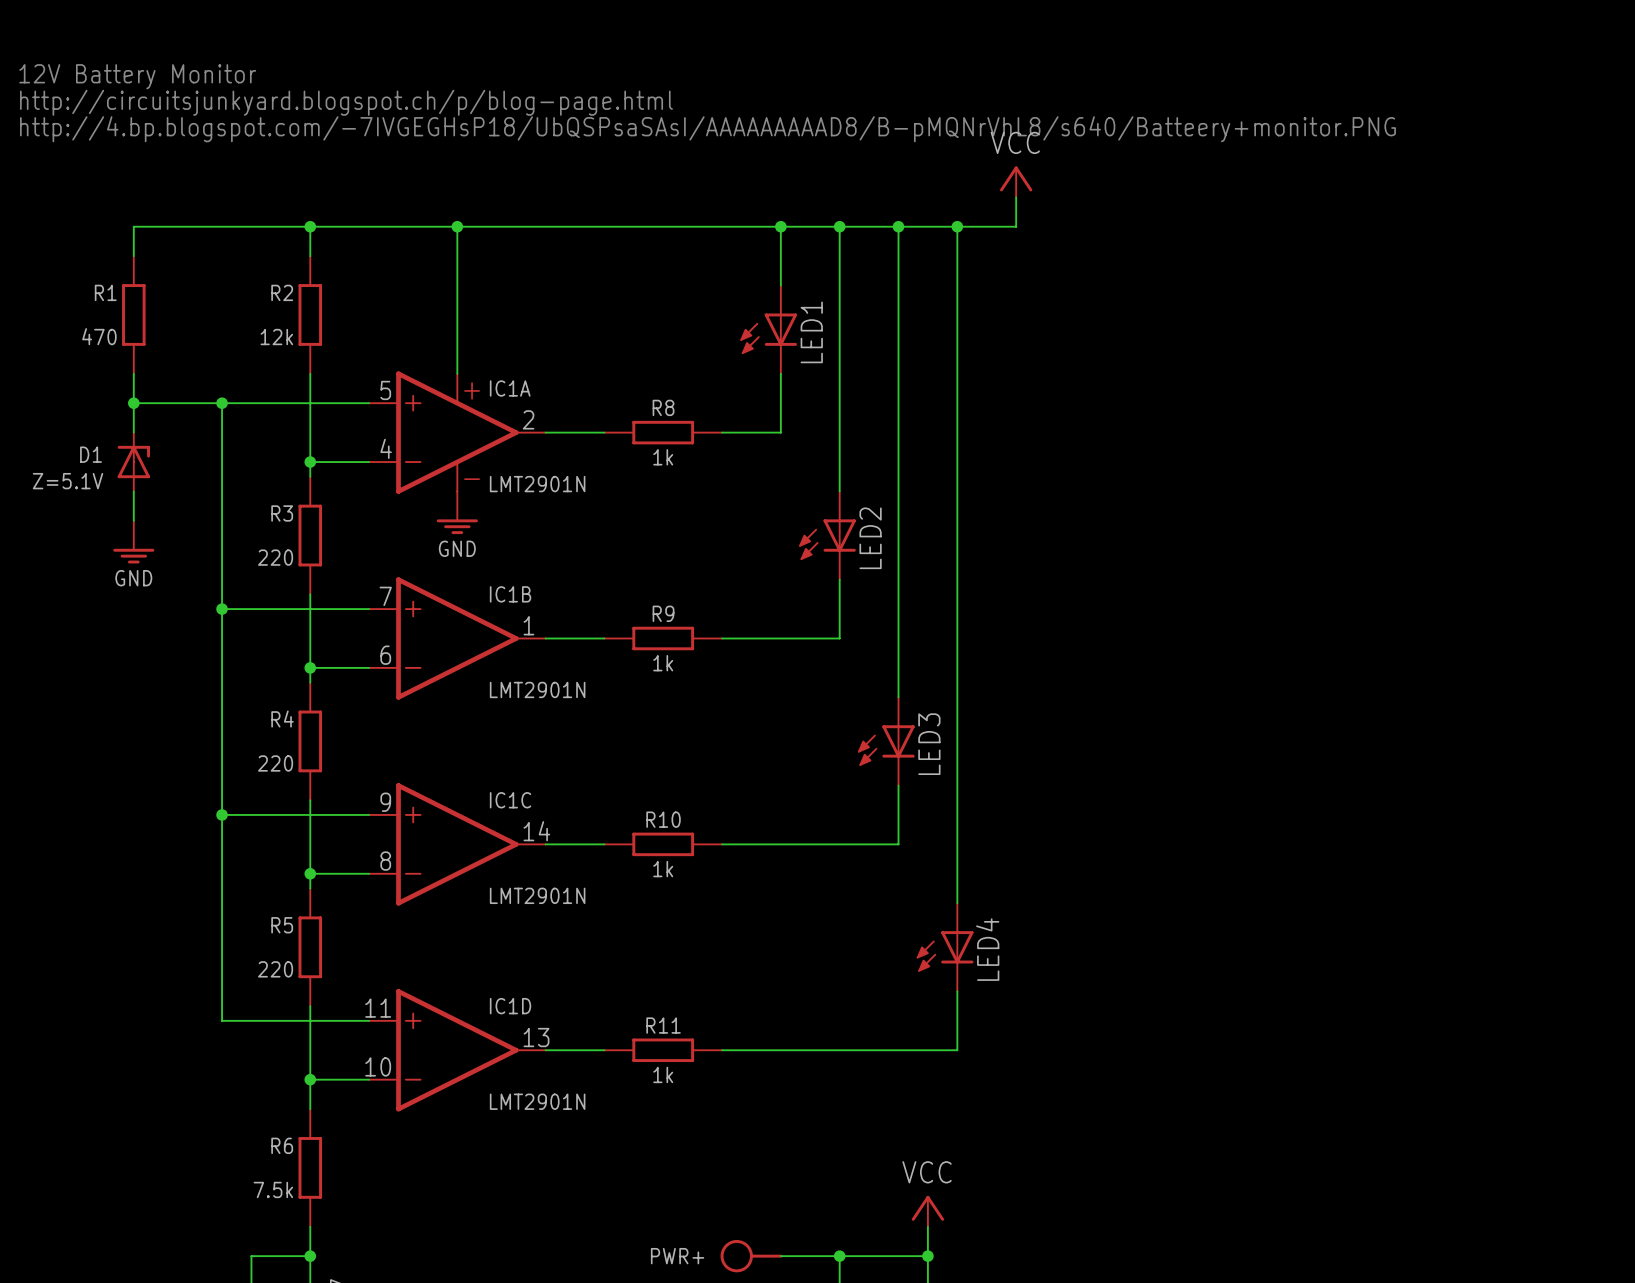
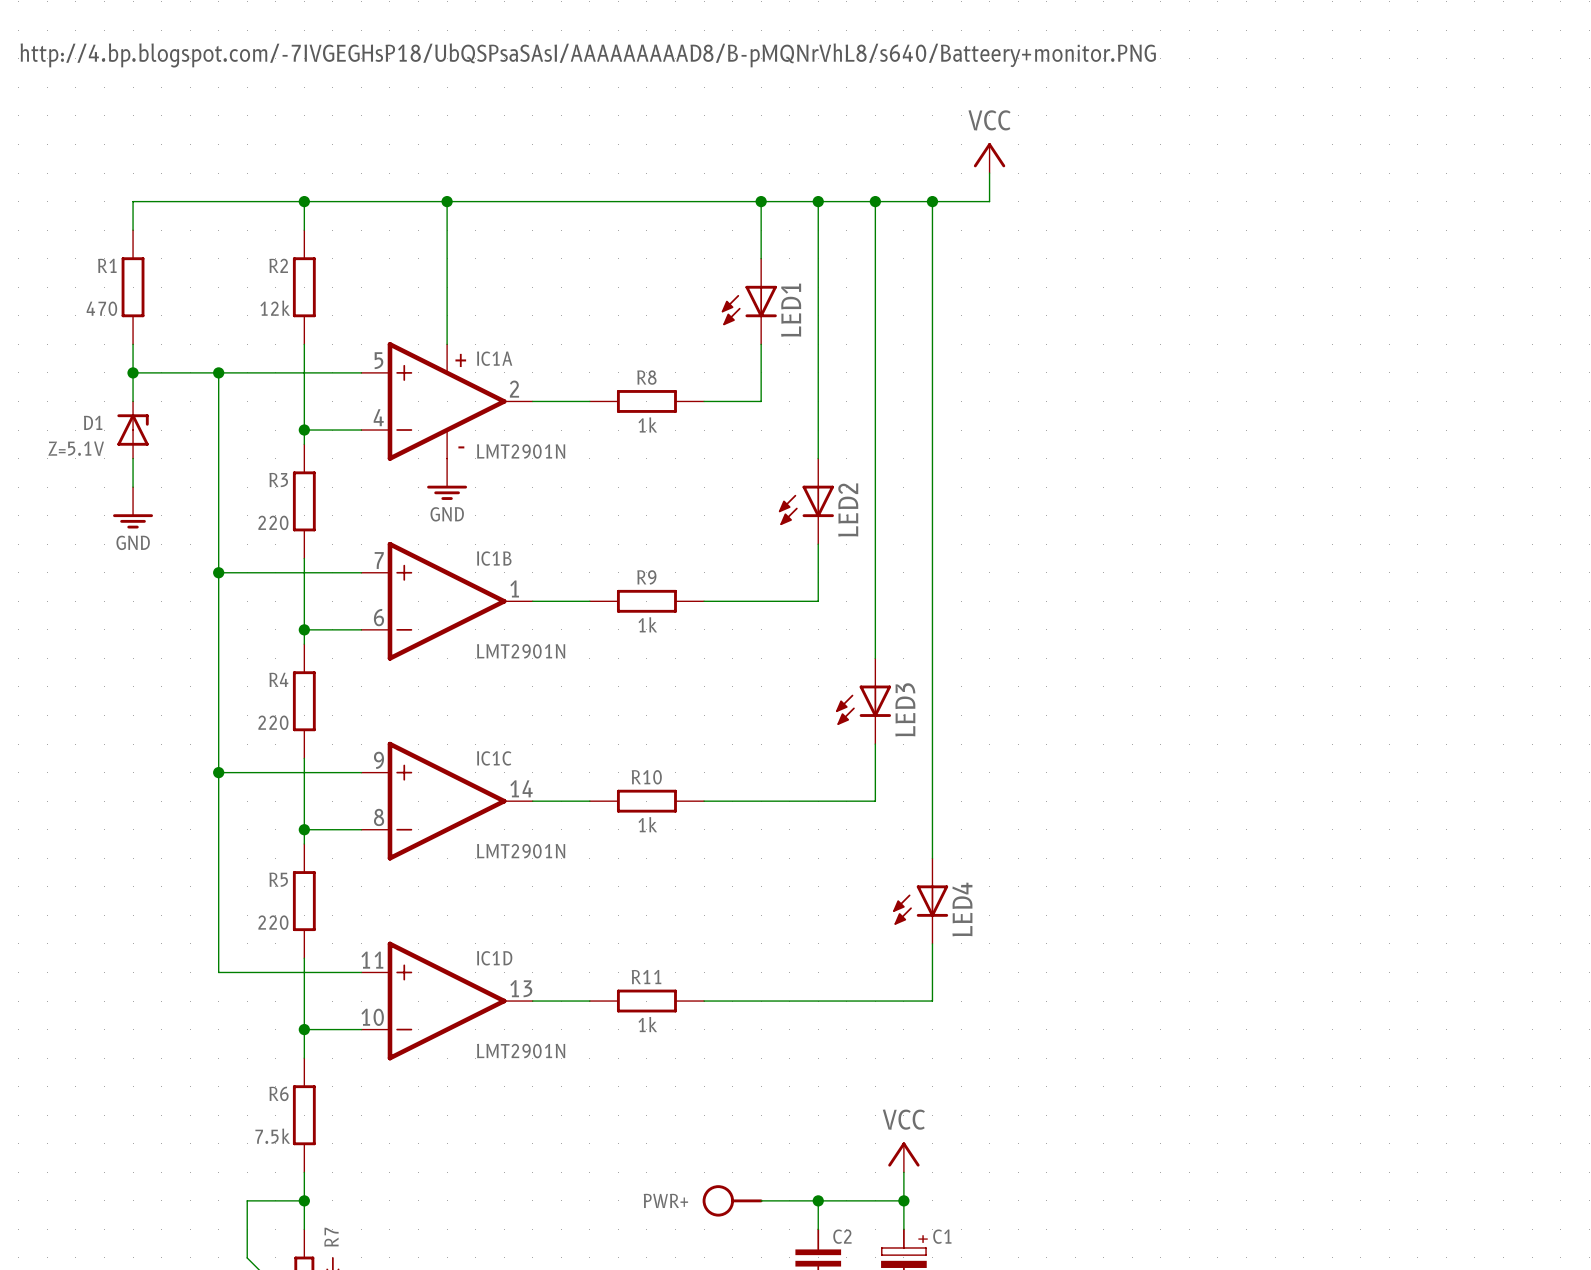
text: 12V Battery Monitor (137, 76) -> http://4.bp.blogspot.com/-7IVGEGHsP18/UbQSPsaSAsI/AAAAAAAAAD8/B-pMQNrVhL8/s640/Batteery+monitor.PNG (588, 55)
text: http://circuitsjunkyard.blogspot.ch/p/blog-page.html (346, 102) -> none
text: http://4.bp.blogspot.com/-7IVGEGHsP18/UbQSPsaSAsI/AAAAAAAAAD8/B-pMQNrVhL8/s640/Batteery+monitor.PNG (707, 129) -> none

